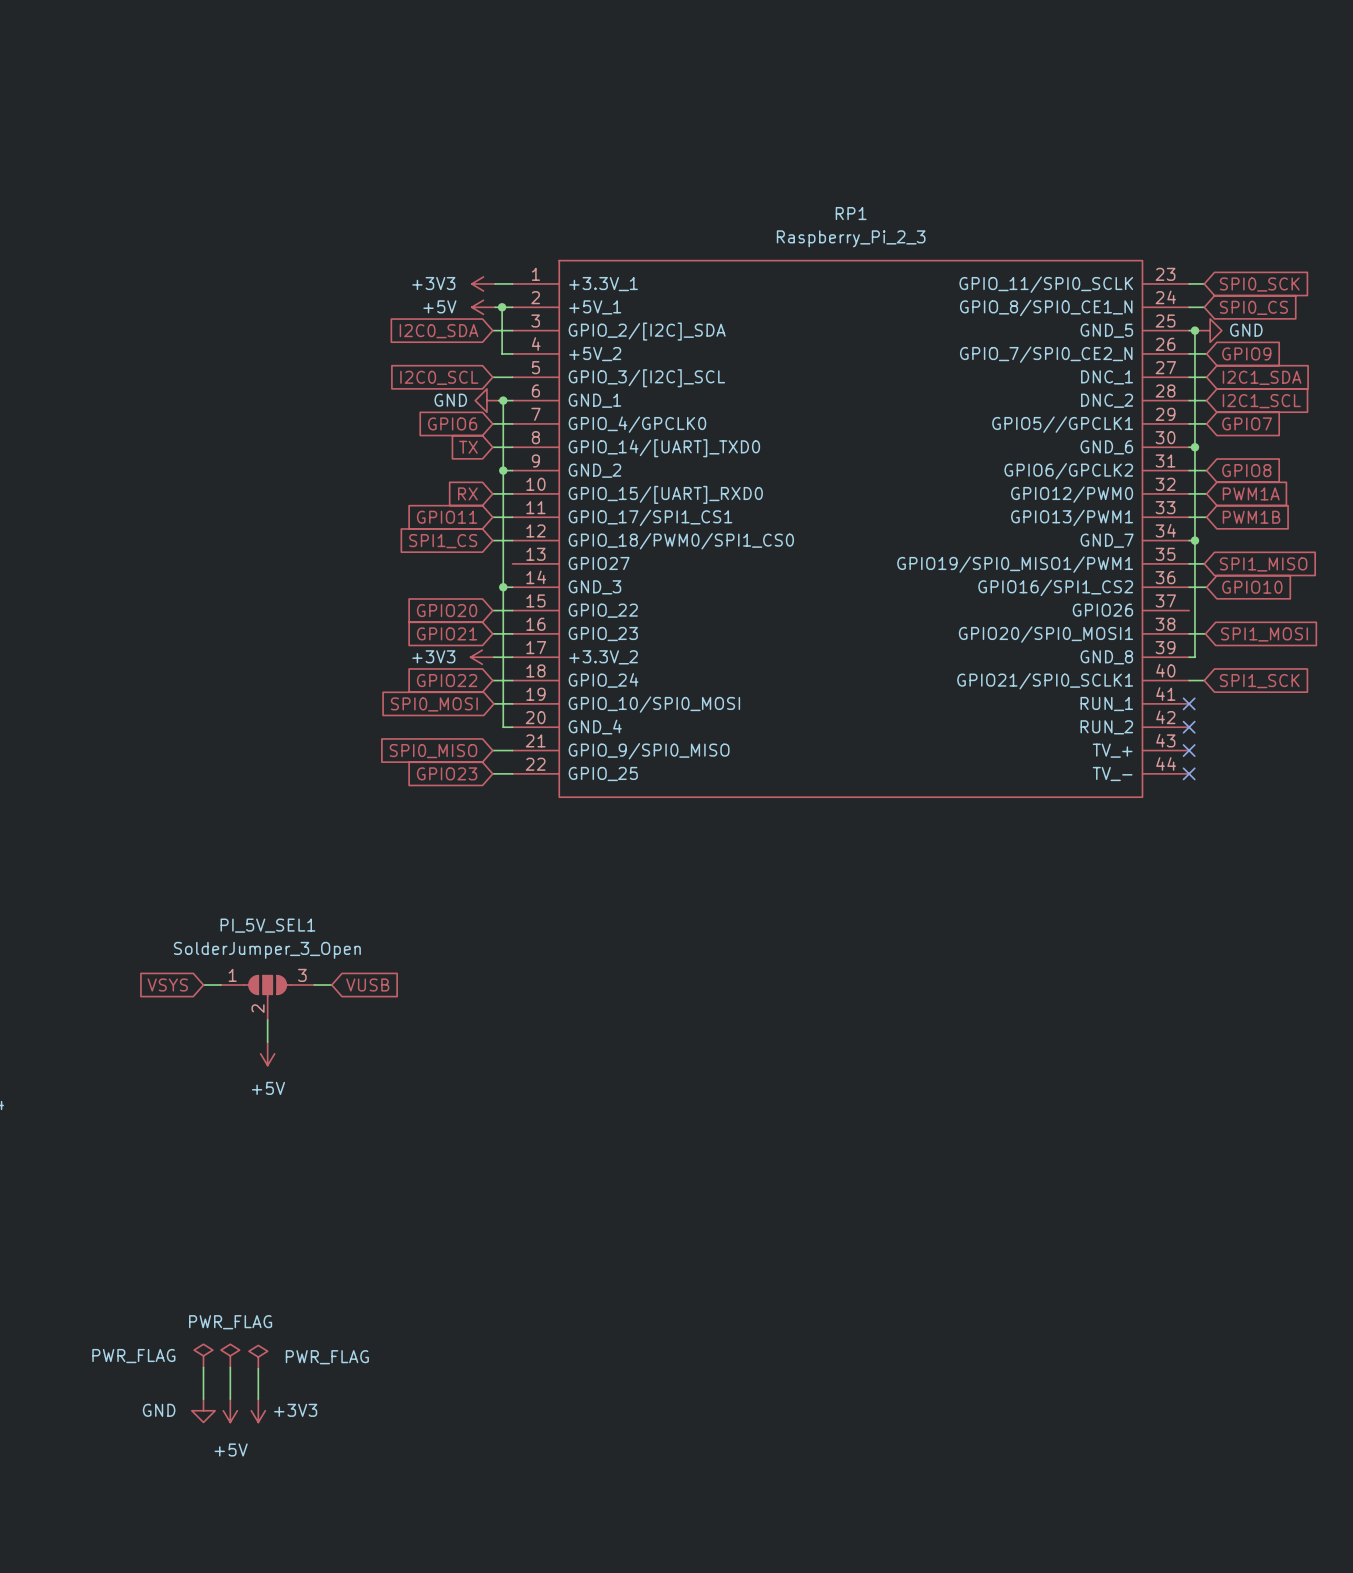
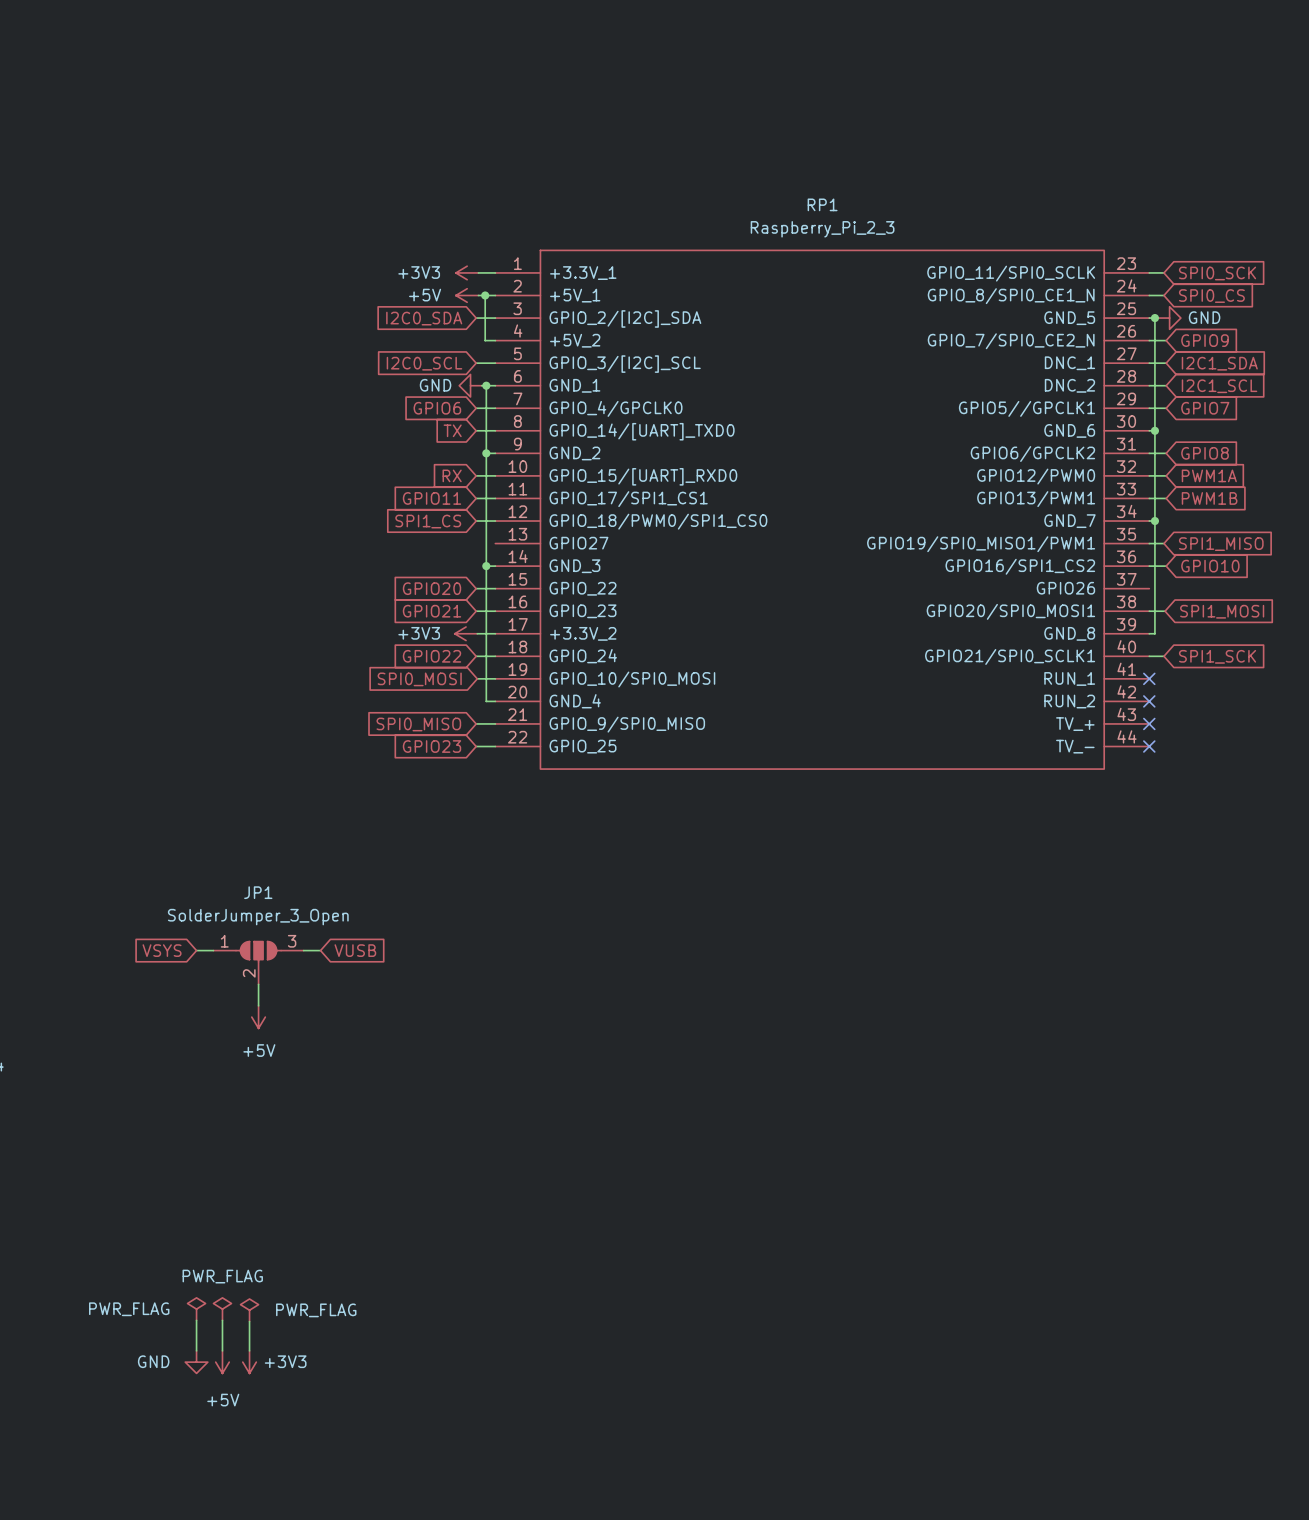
PI_5V_SEL1 name: PI_5V_SEL1 (267, 925) -> JP1 (258, 892)

